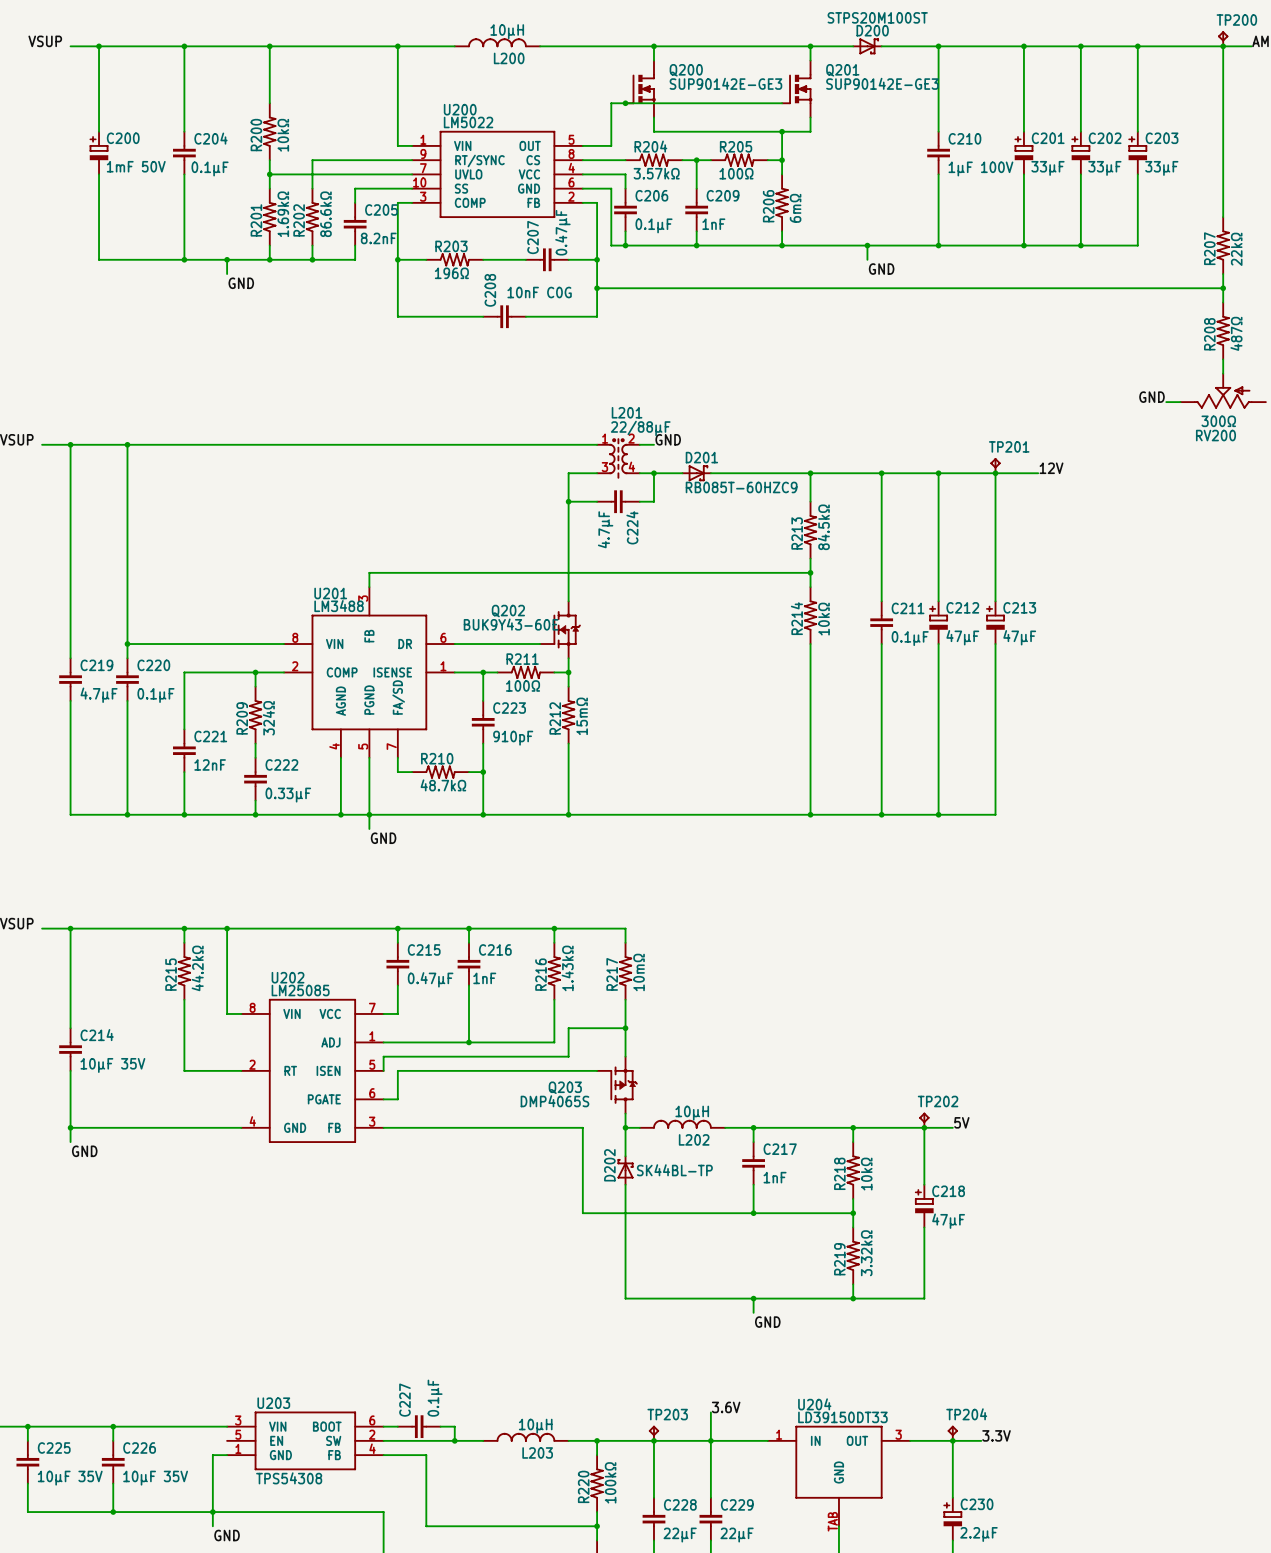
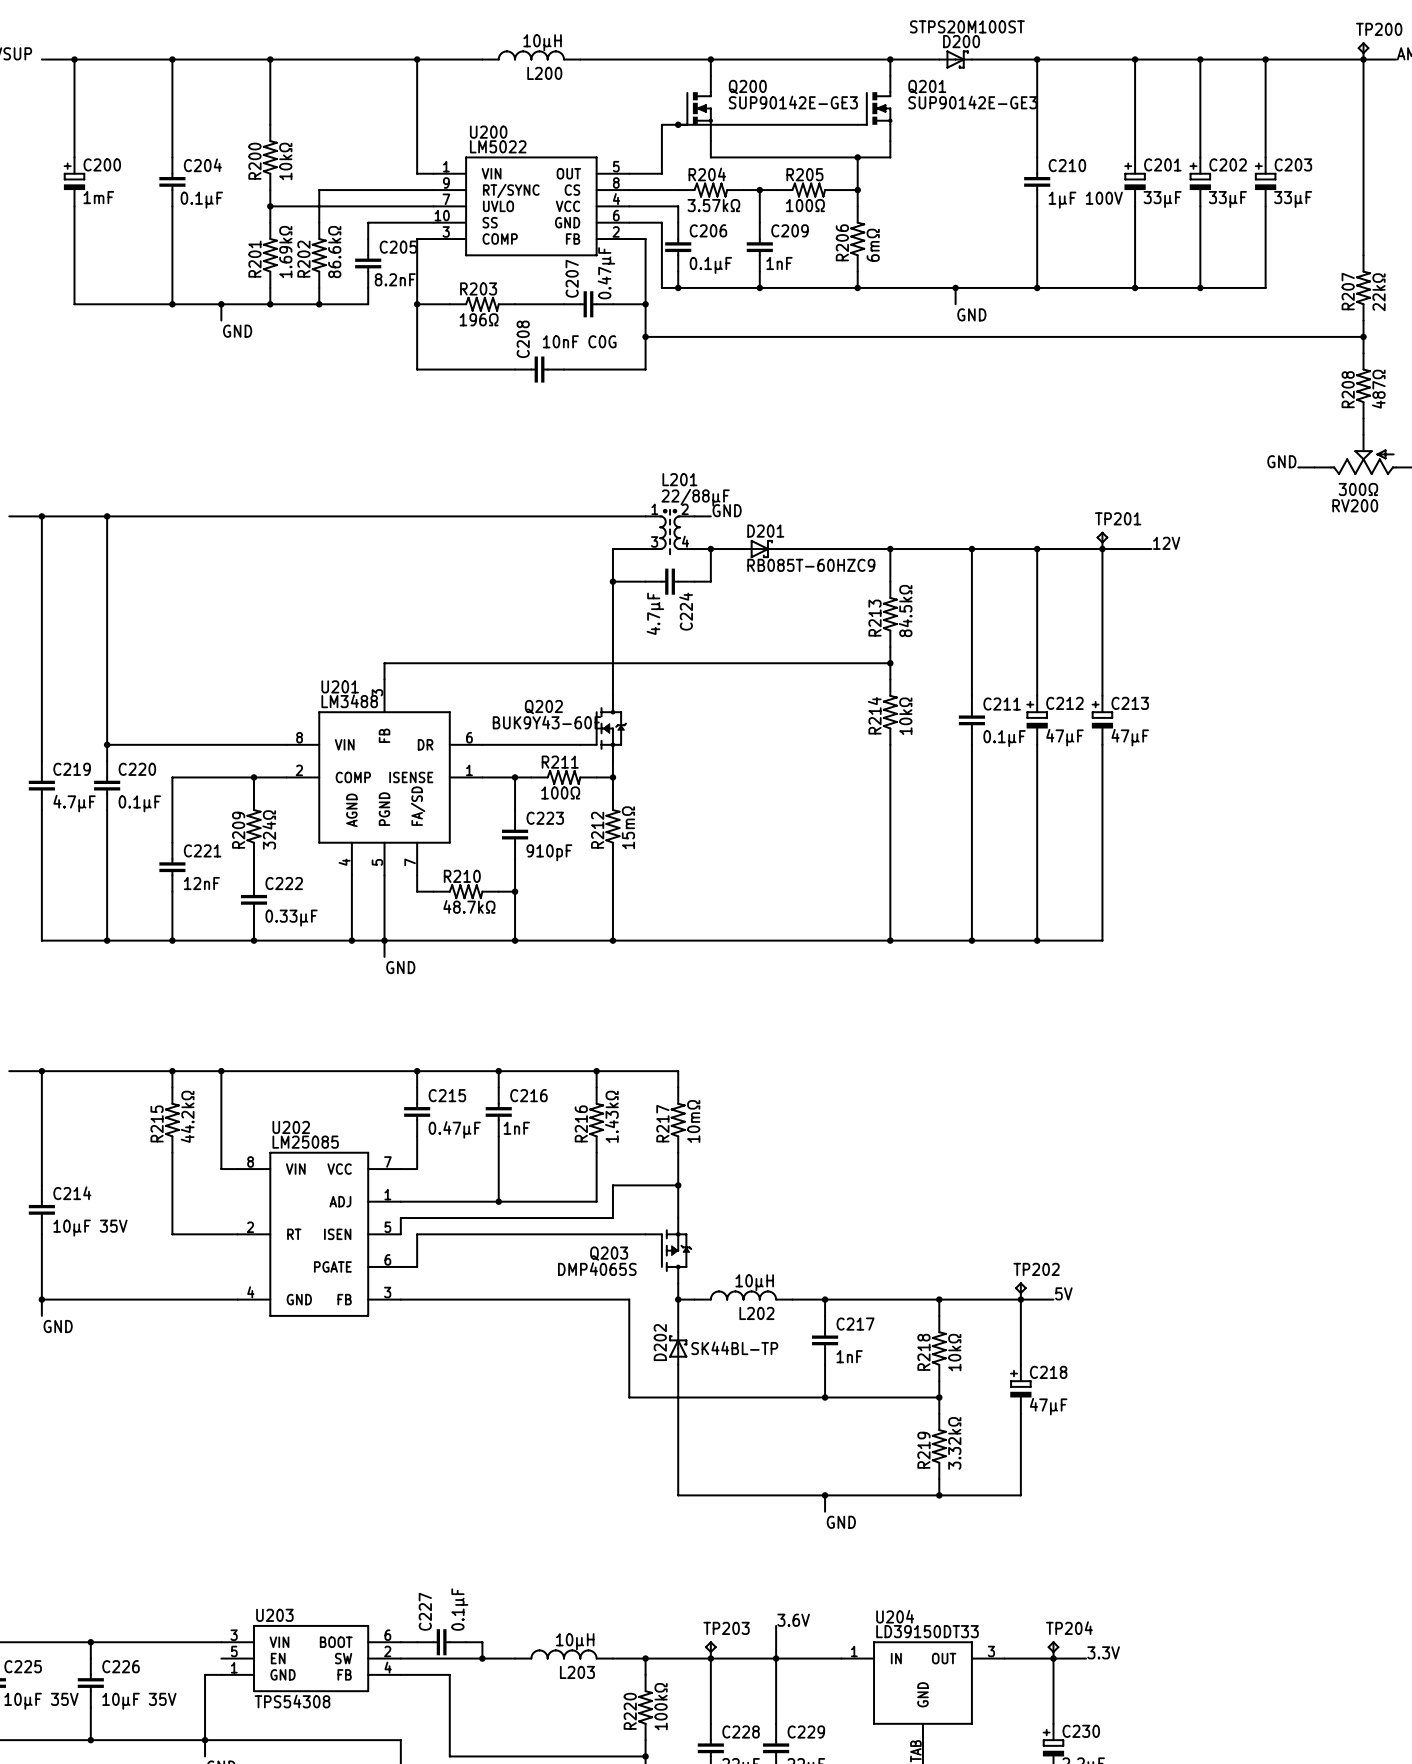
C200 value: 1mF 50V (136, 166) -> 1mF (98, 197)

